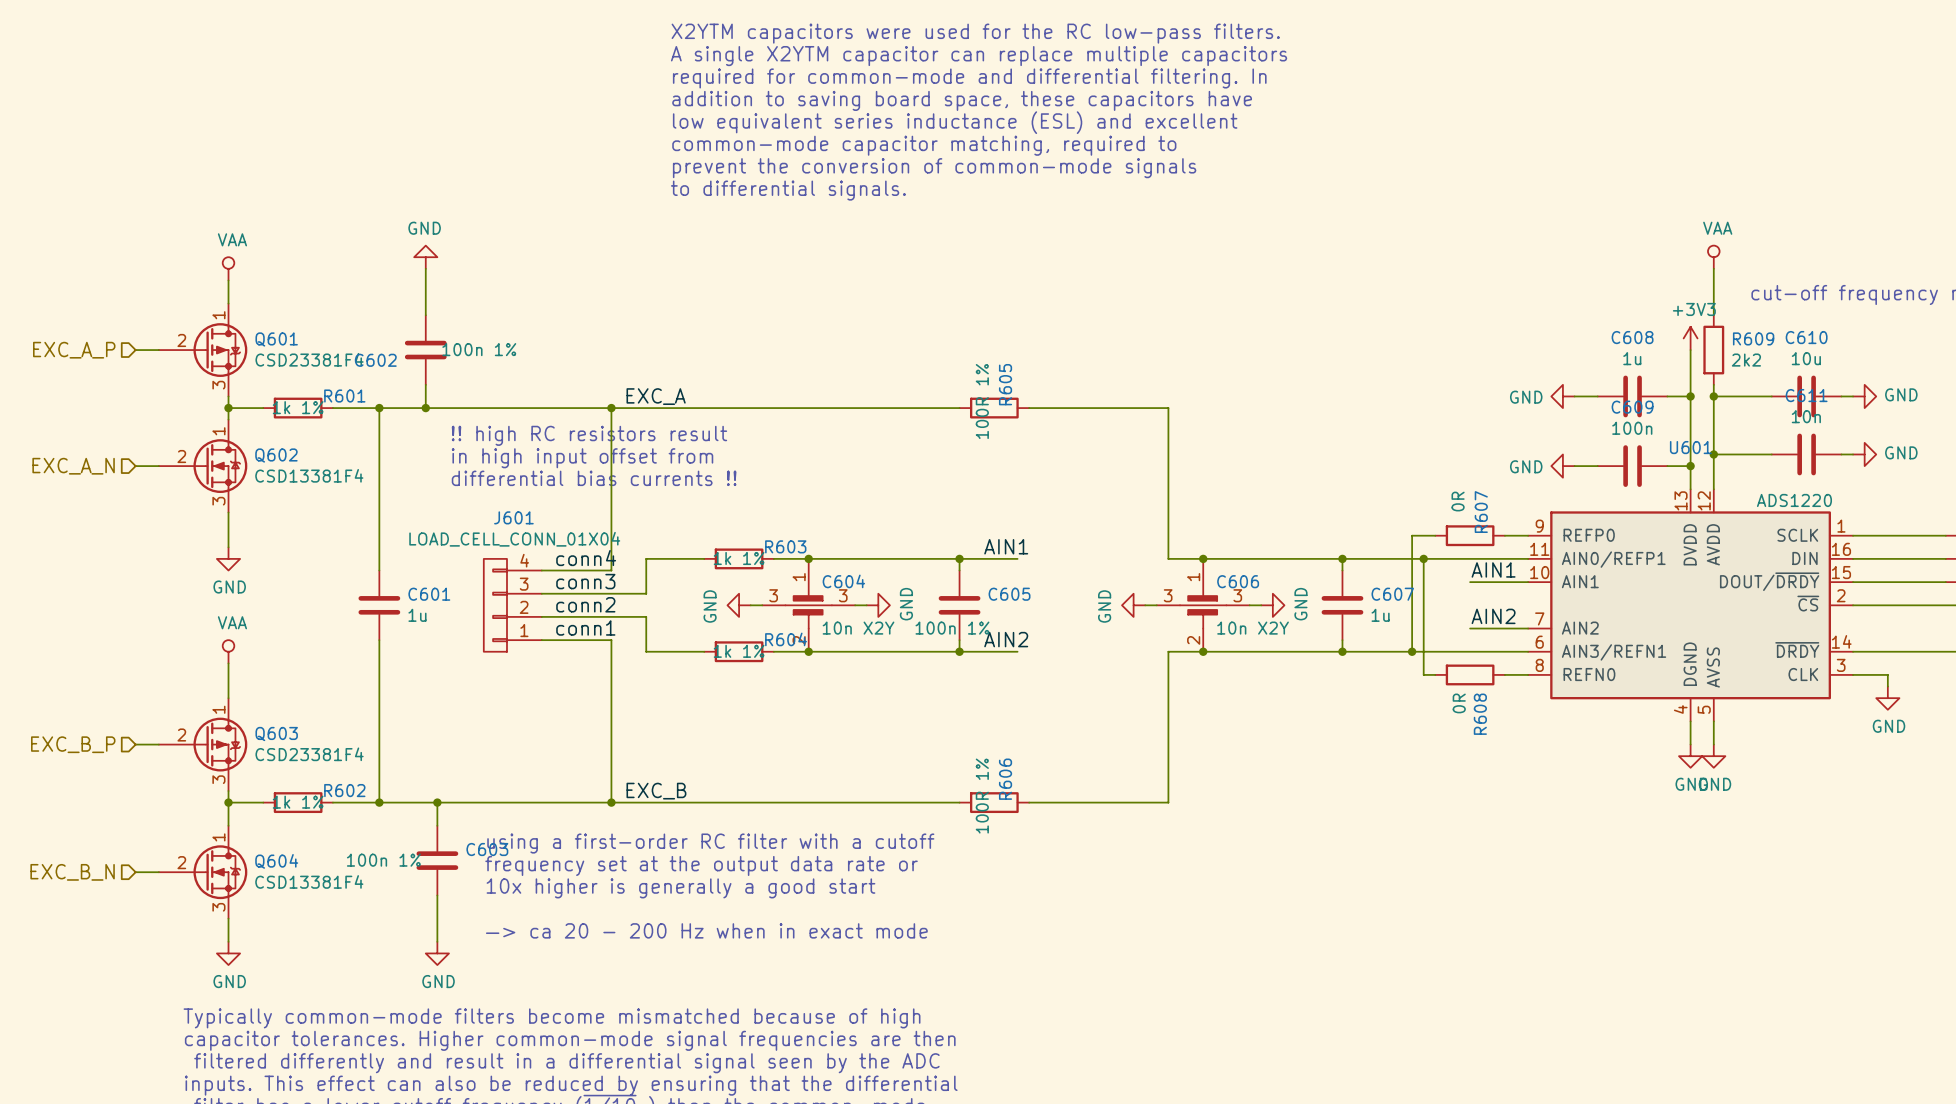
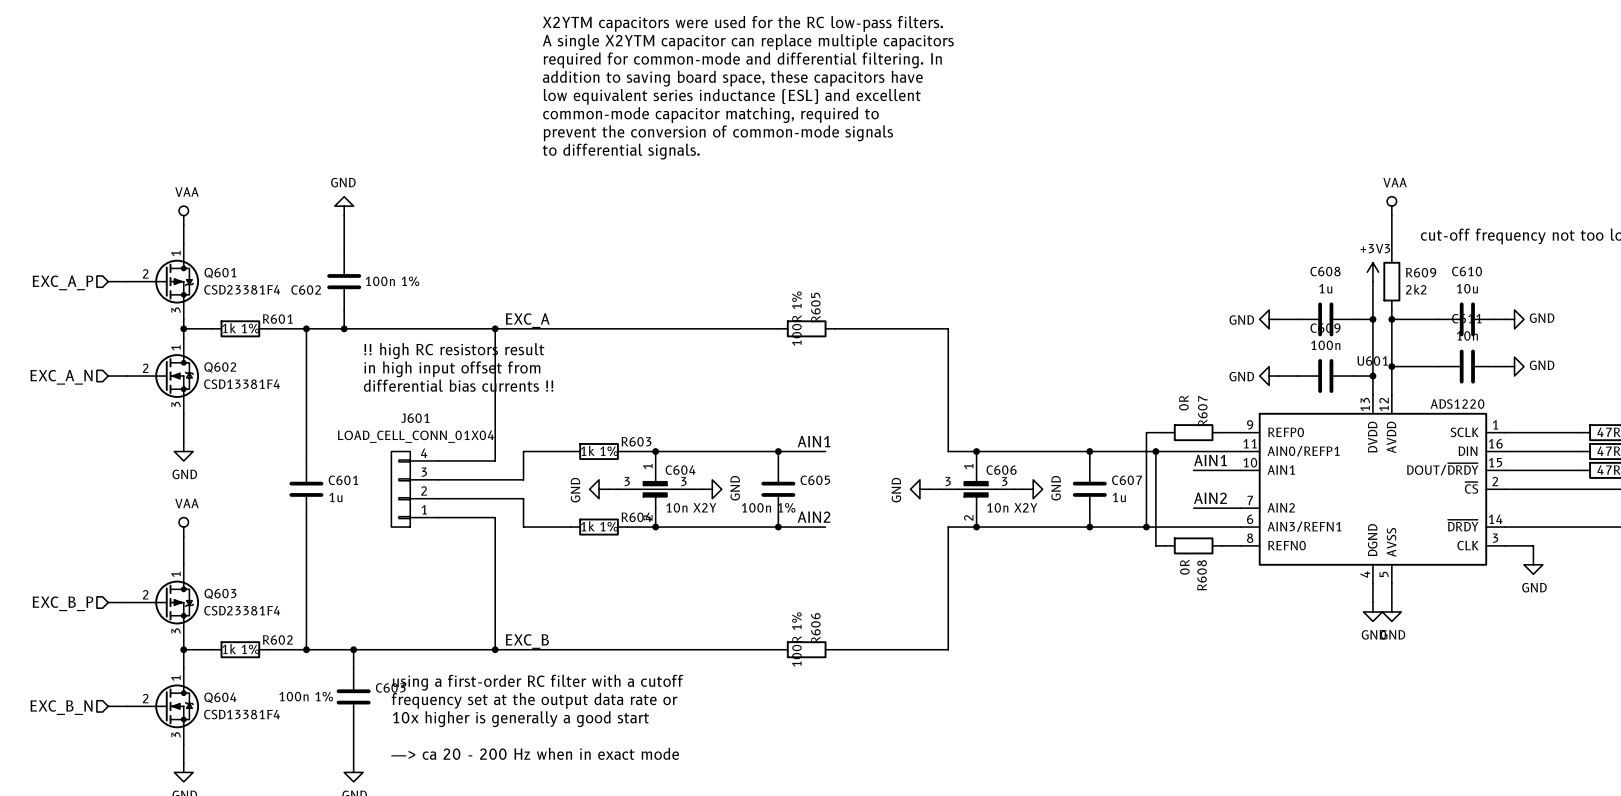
label: conn4 (586, 558) -> none
label: conn3 (585, 581) -> none
label: conn2 (585, 604) -> none
label: conn1 (585, 627) -> none

